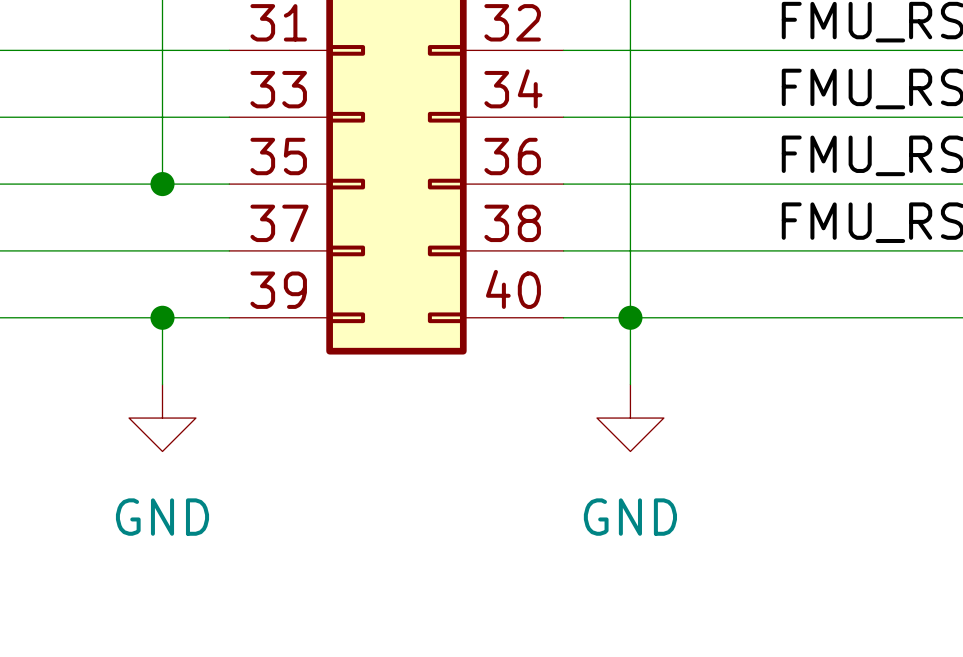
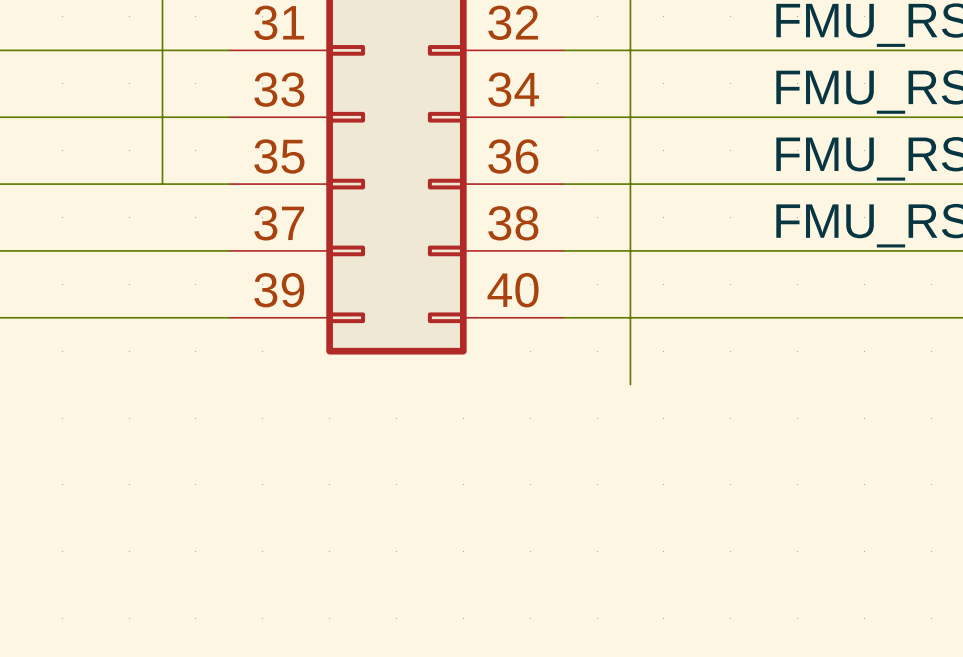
junction: (162, 184) -> none
wire: (162, 317) (162, 384) -> none
junction: (162, 317) -> none
junction: (630, 317) -> none
power symbol: GND (162, 418) -> none
power symbol: GND (630, 418) -> none

